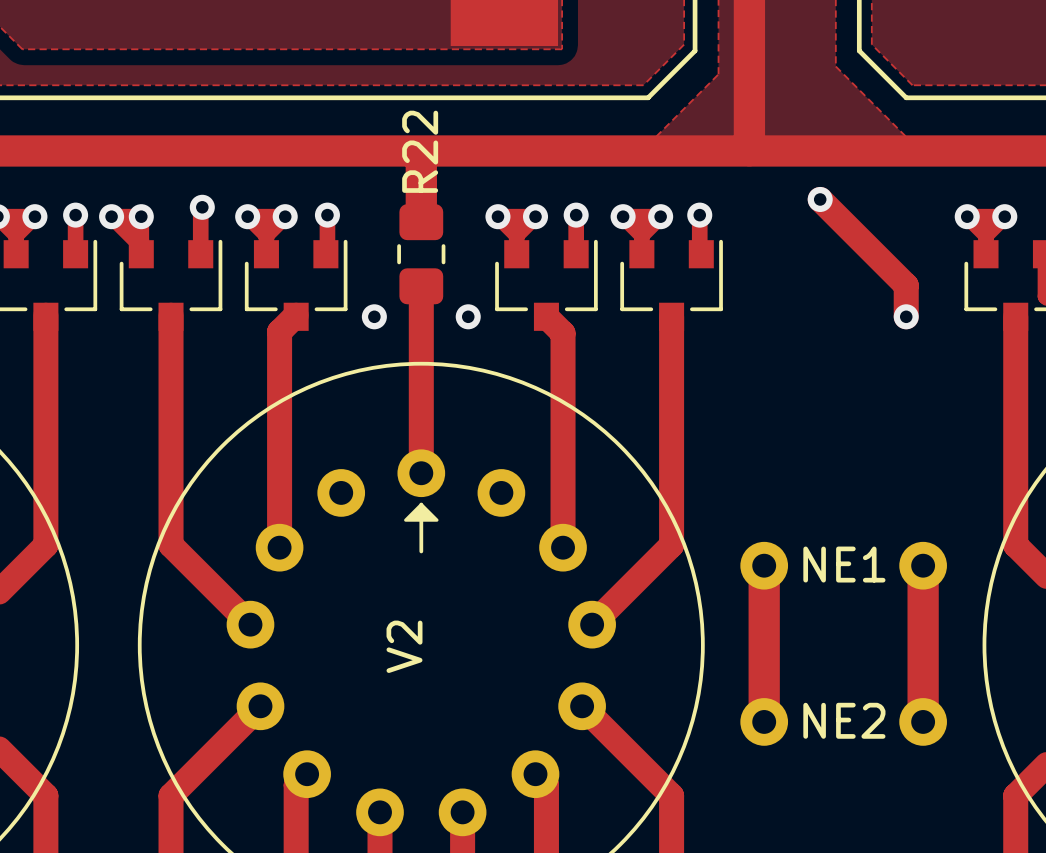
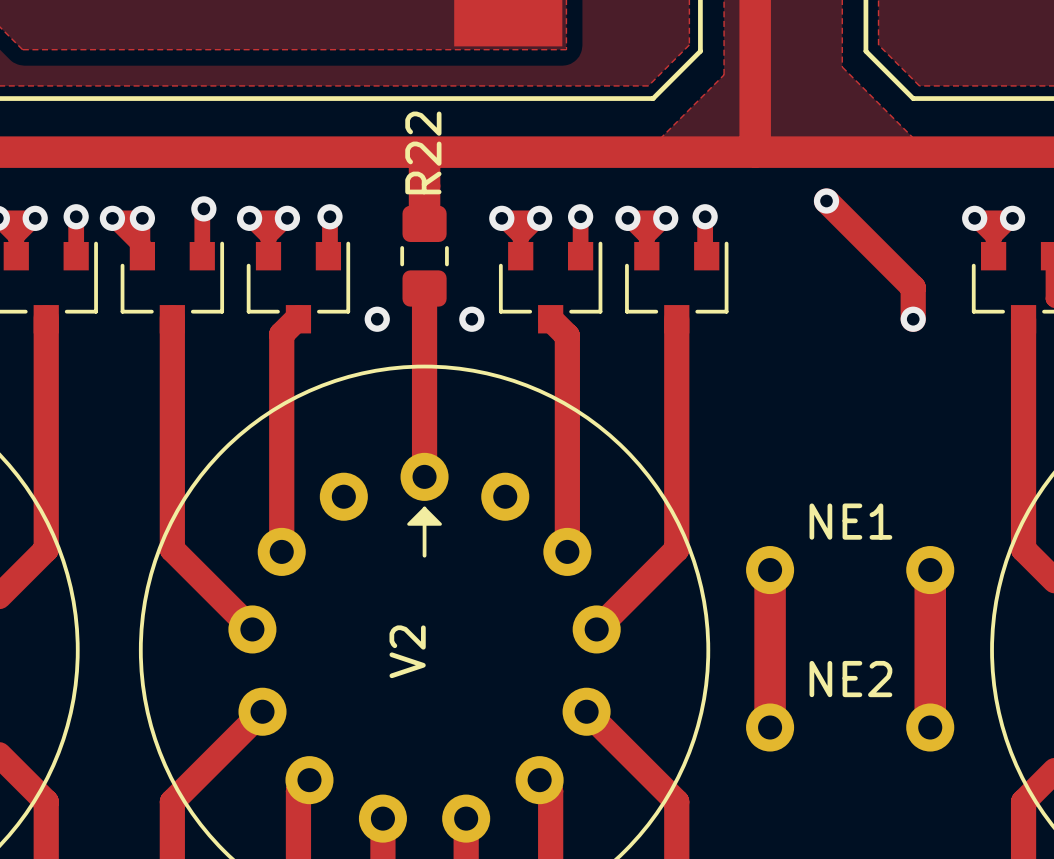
NE1 name position: NE1 (844, 564) -> NE1 (850, 521)
NE2 name position: NE2 (844, 720) -> NE2 (850, 679)

